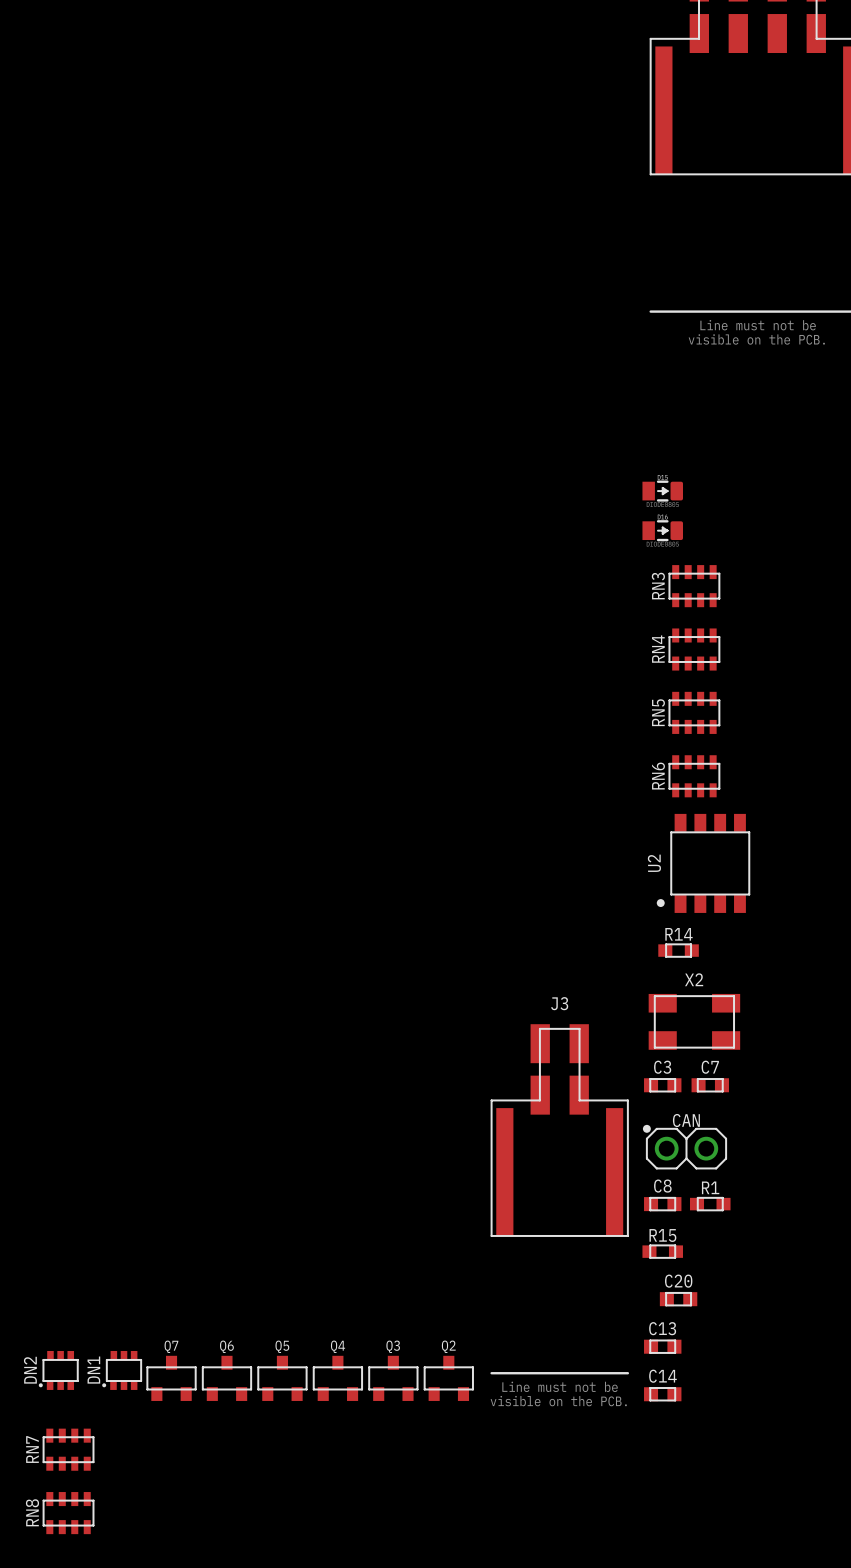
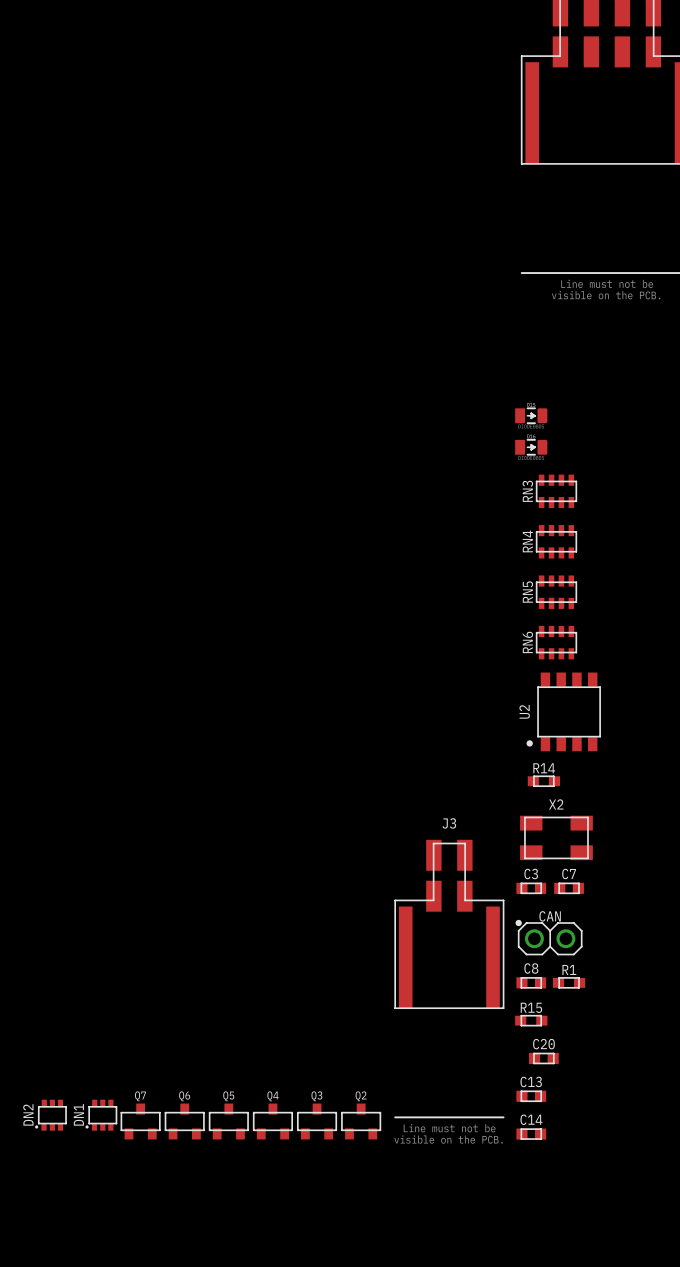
RN7: (68, 1449) -> none
RN8: (68, 1513) -> none

